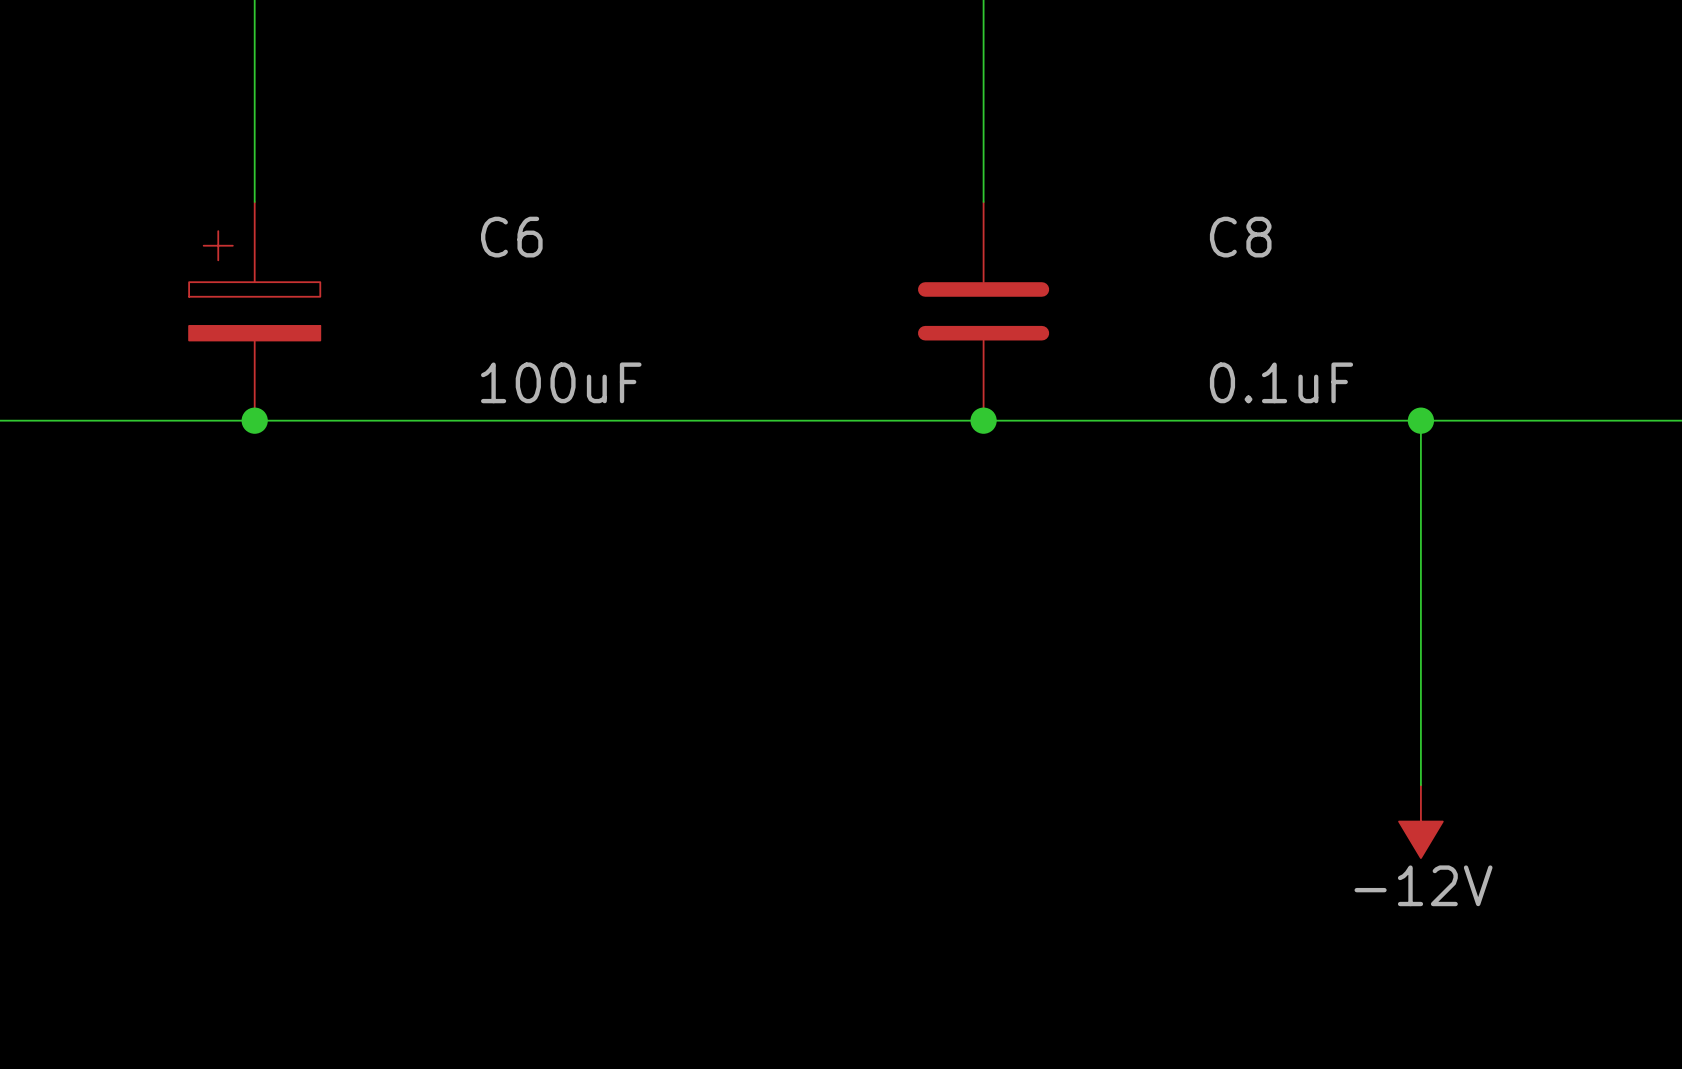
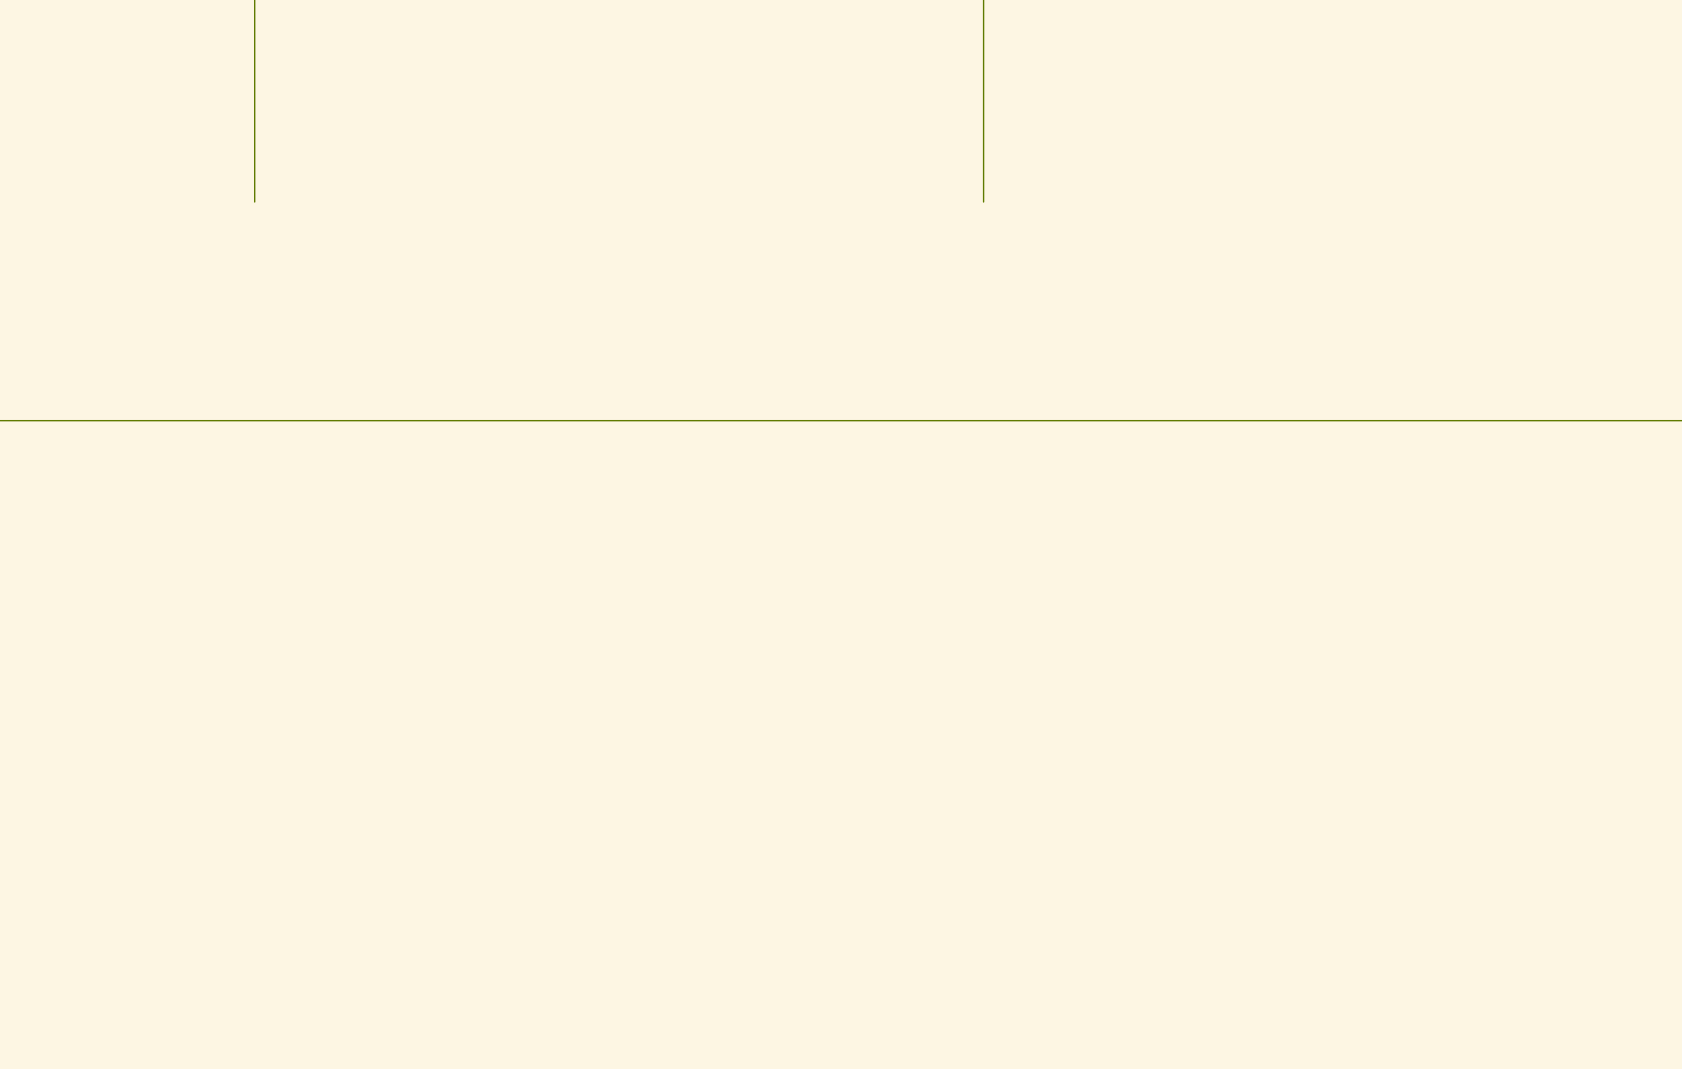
C6: 100uF (254, 311) -> none
C8: 0.1uF (983, 311) -> none
junction: (254, 420) -> none
junction: (983, 420) -> none
wire: (1420, 420) (1420, 785) -> none
junction: (1420, 420) -> none
power symbol: -12V (1420, 821) -> none

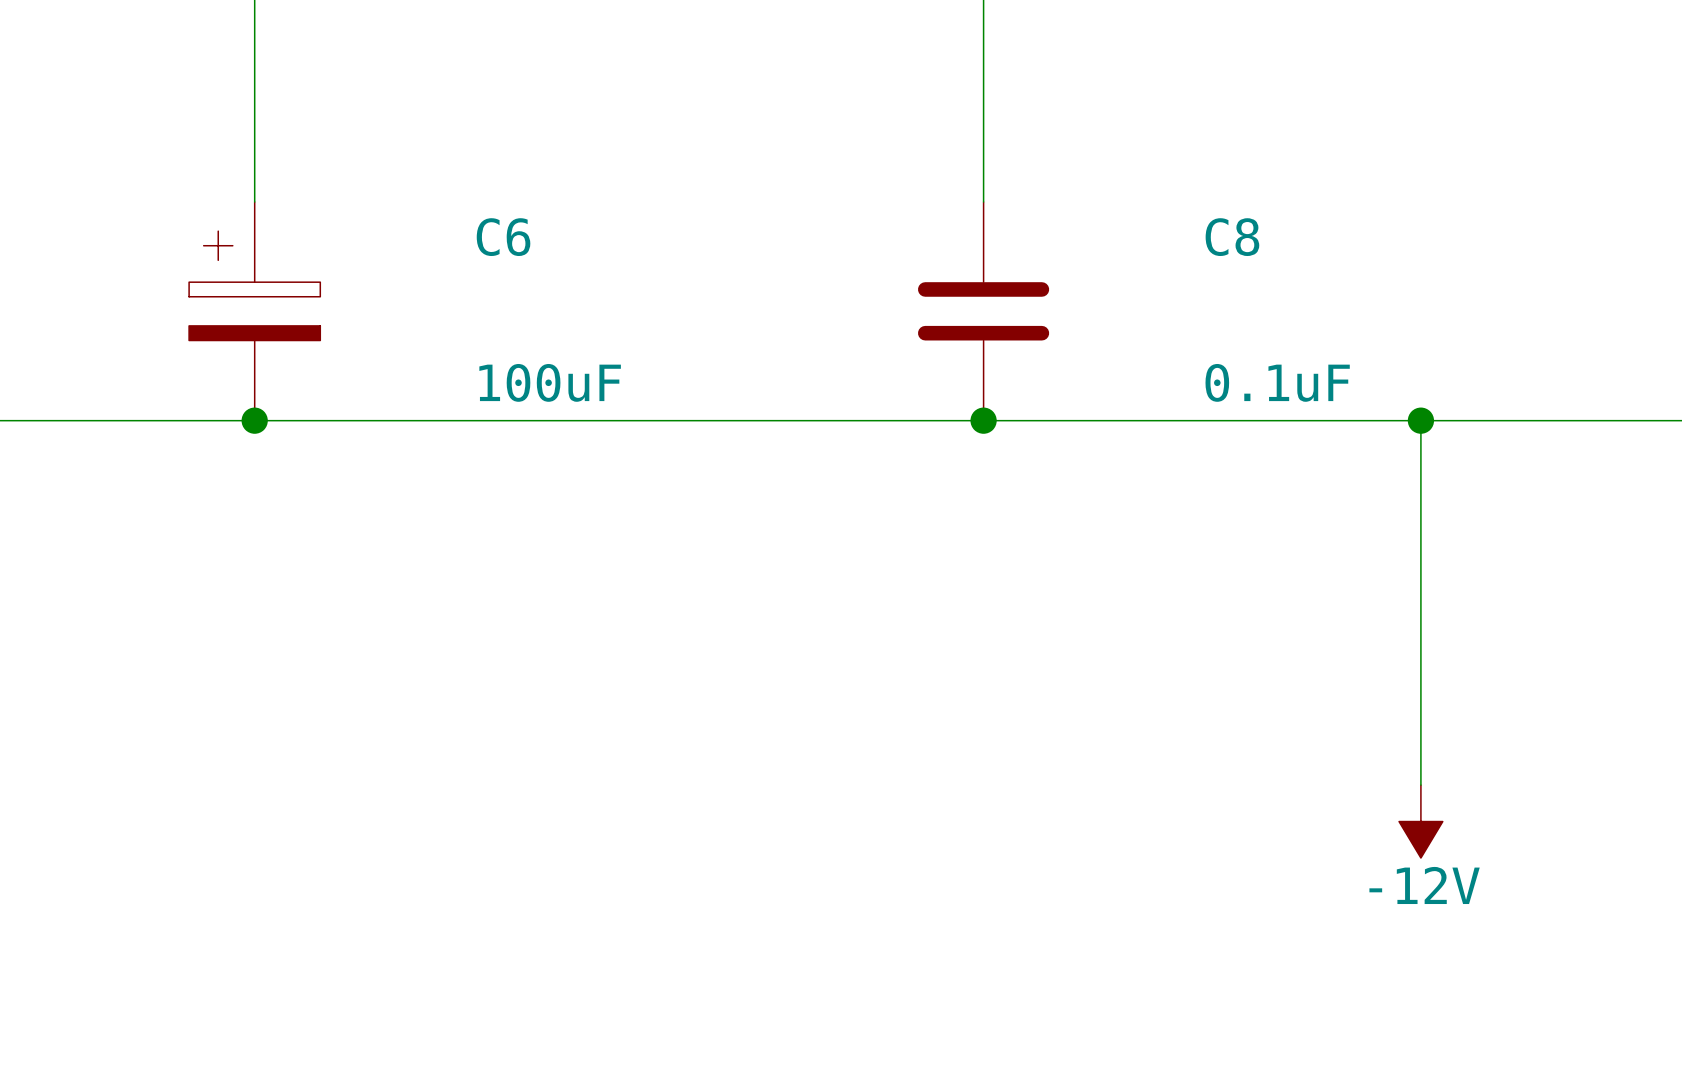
C6: none -> 100uF (254, 311)
C8: none -> 0.1uF (983, 311)
junction: none -> (254, 420)
junction: none -> (983, 420)
wire: none -> (1420, 420) (1420, 785)
junction: none -> (1420, 420)
power symbol: none -> -12V (1420, 821)

